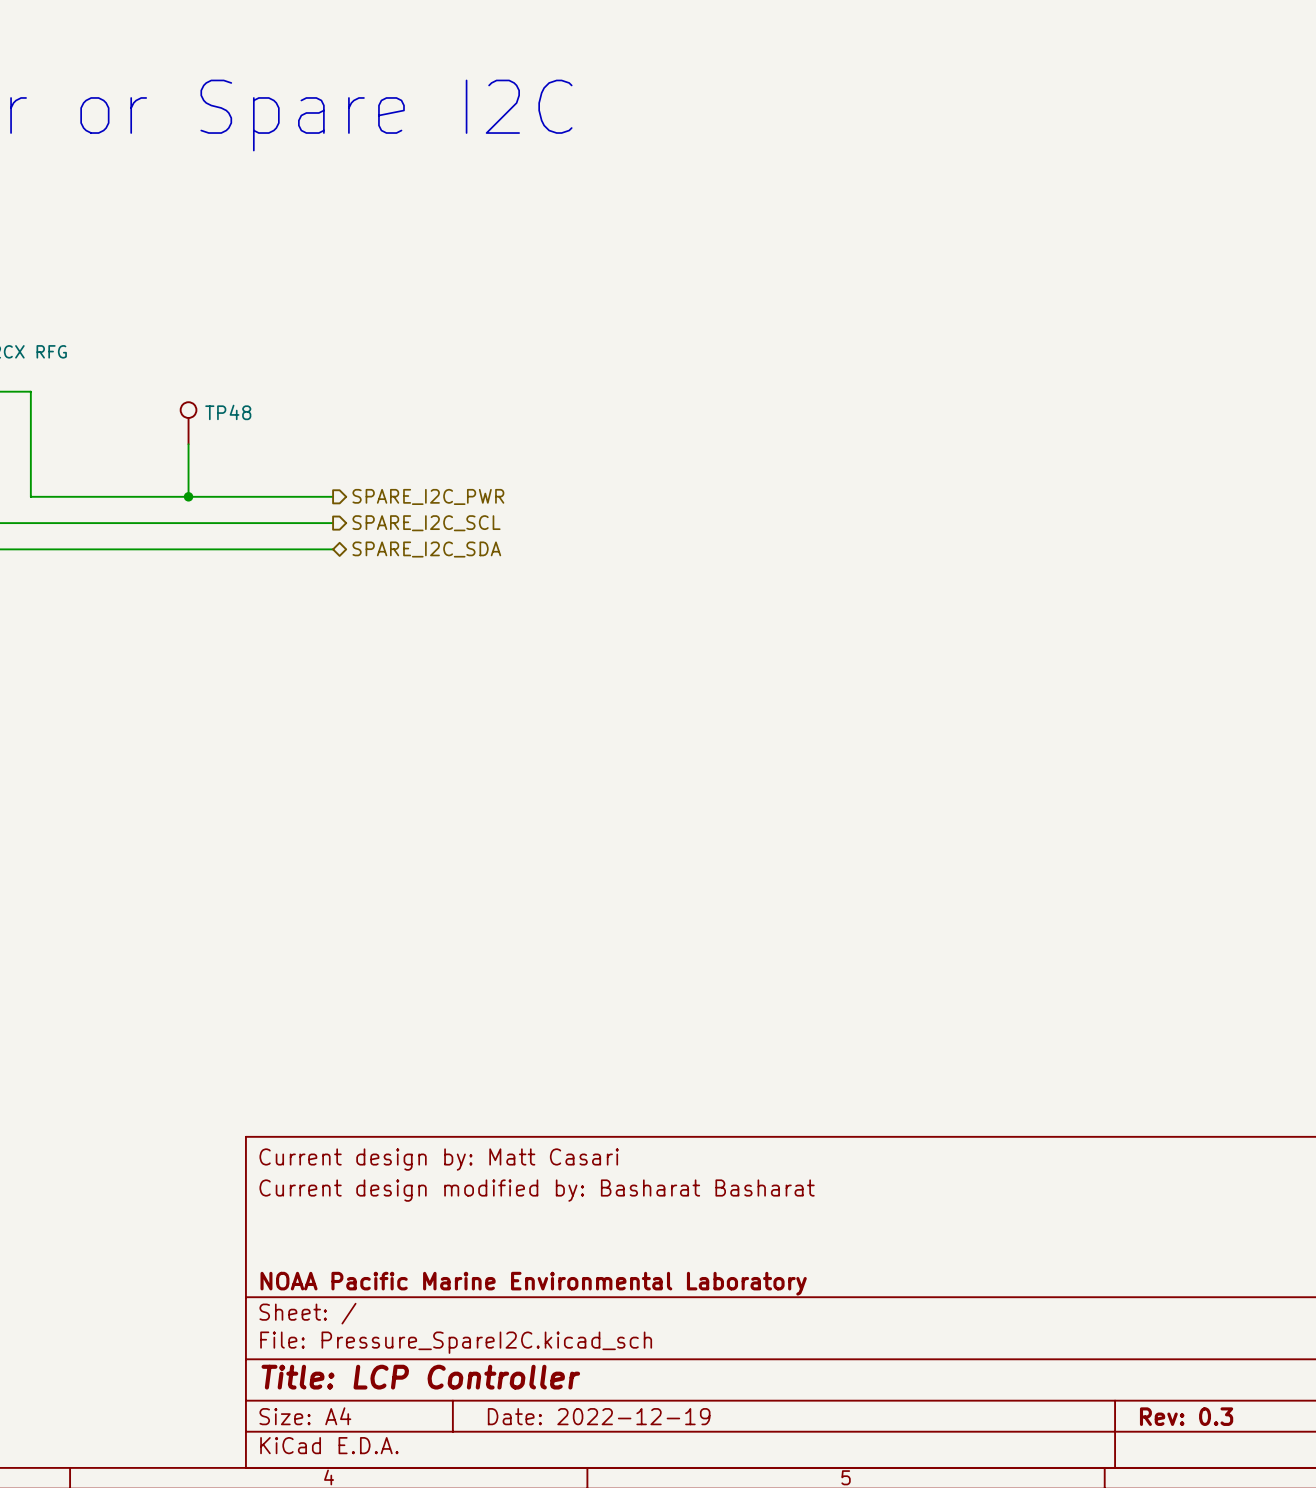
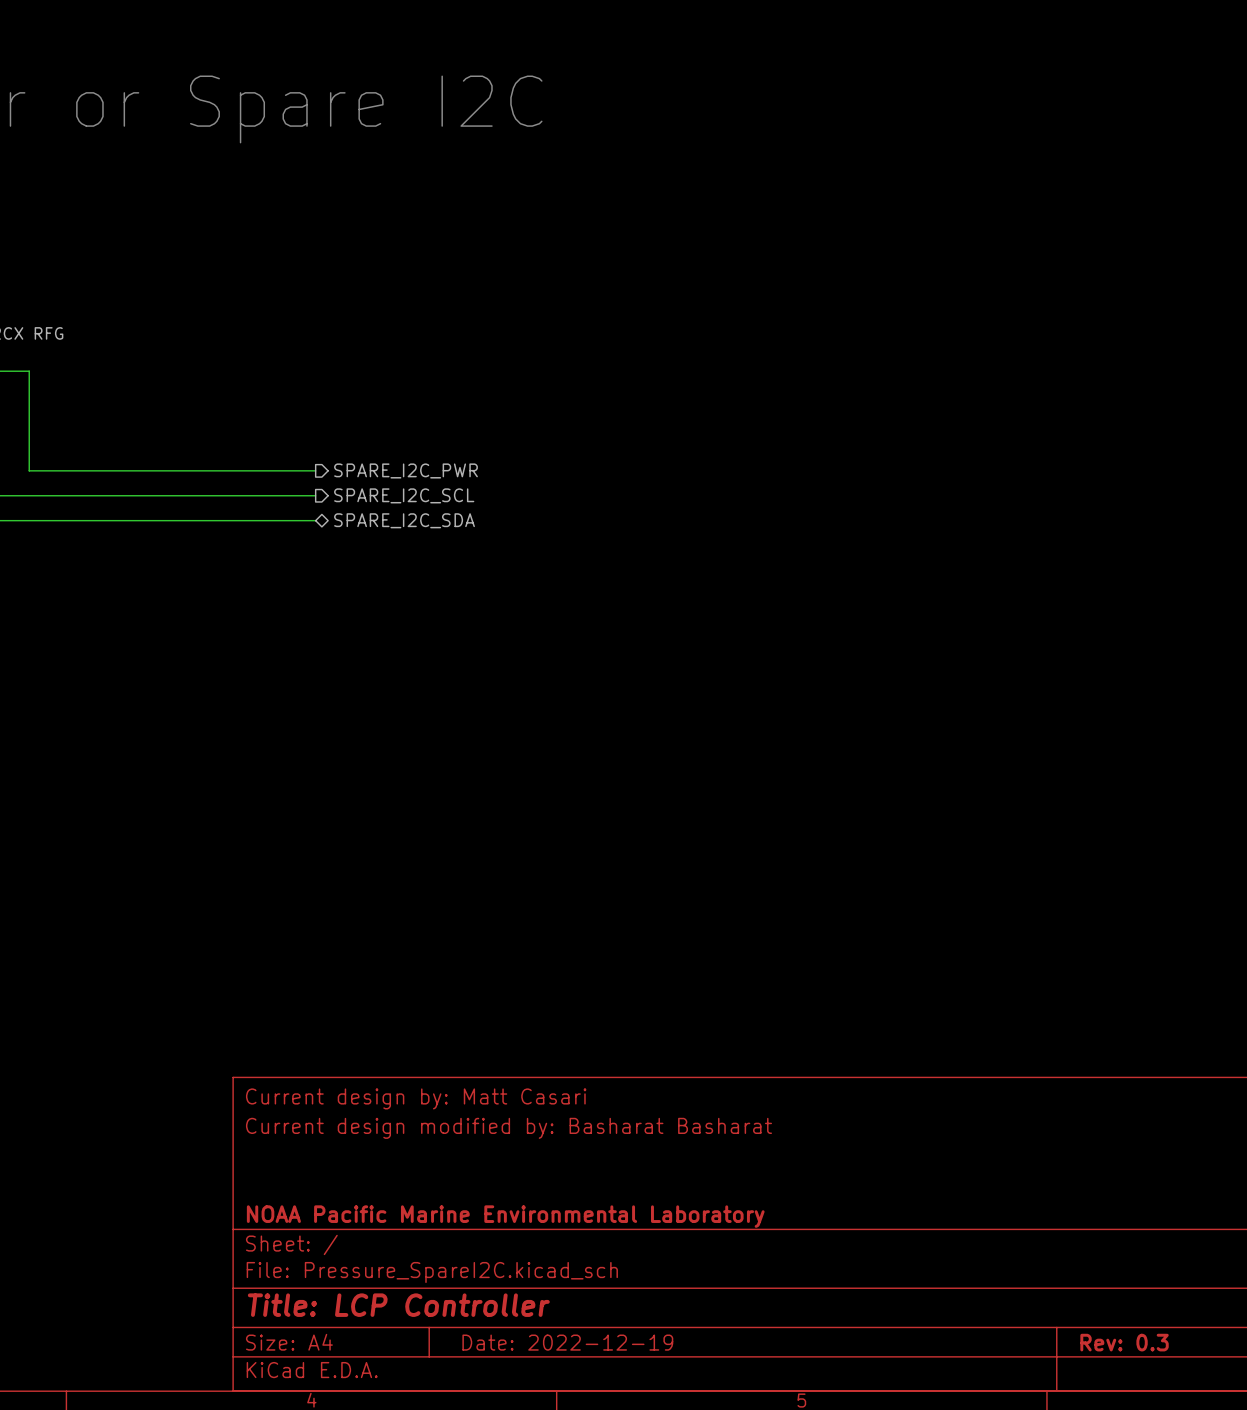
TP48: (188, 423) -> none
wire: (188, 444) (188, 496) -> none
junction: (188, 496) -> none

